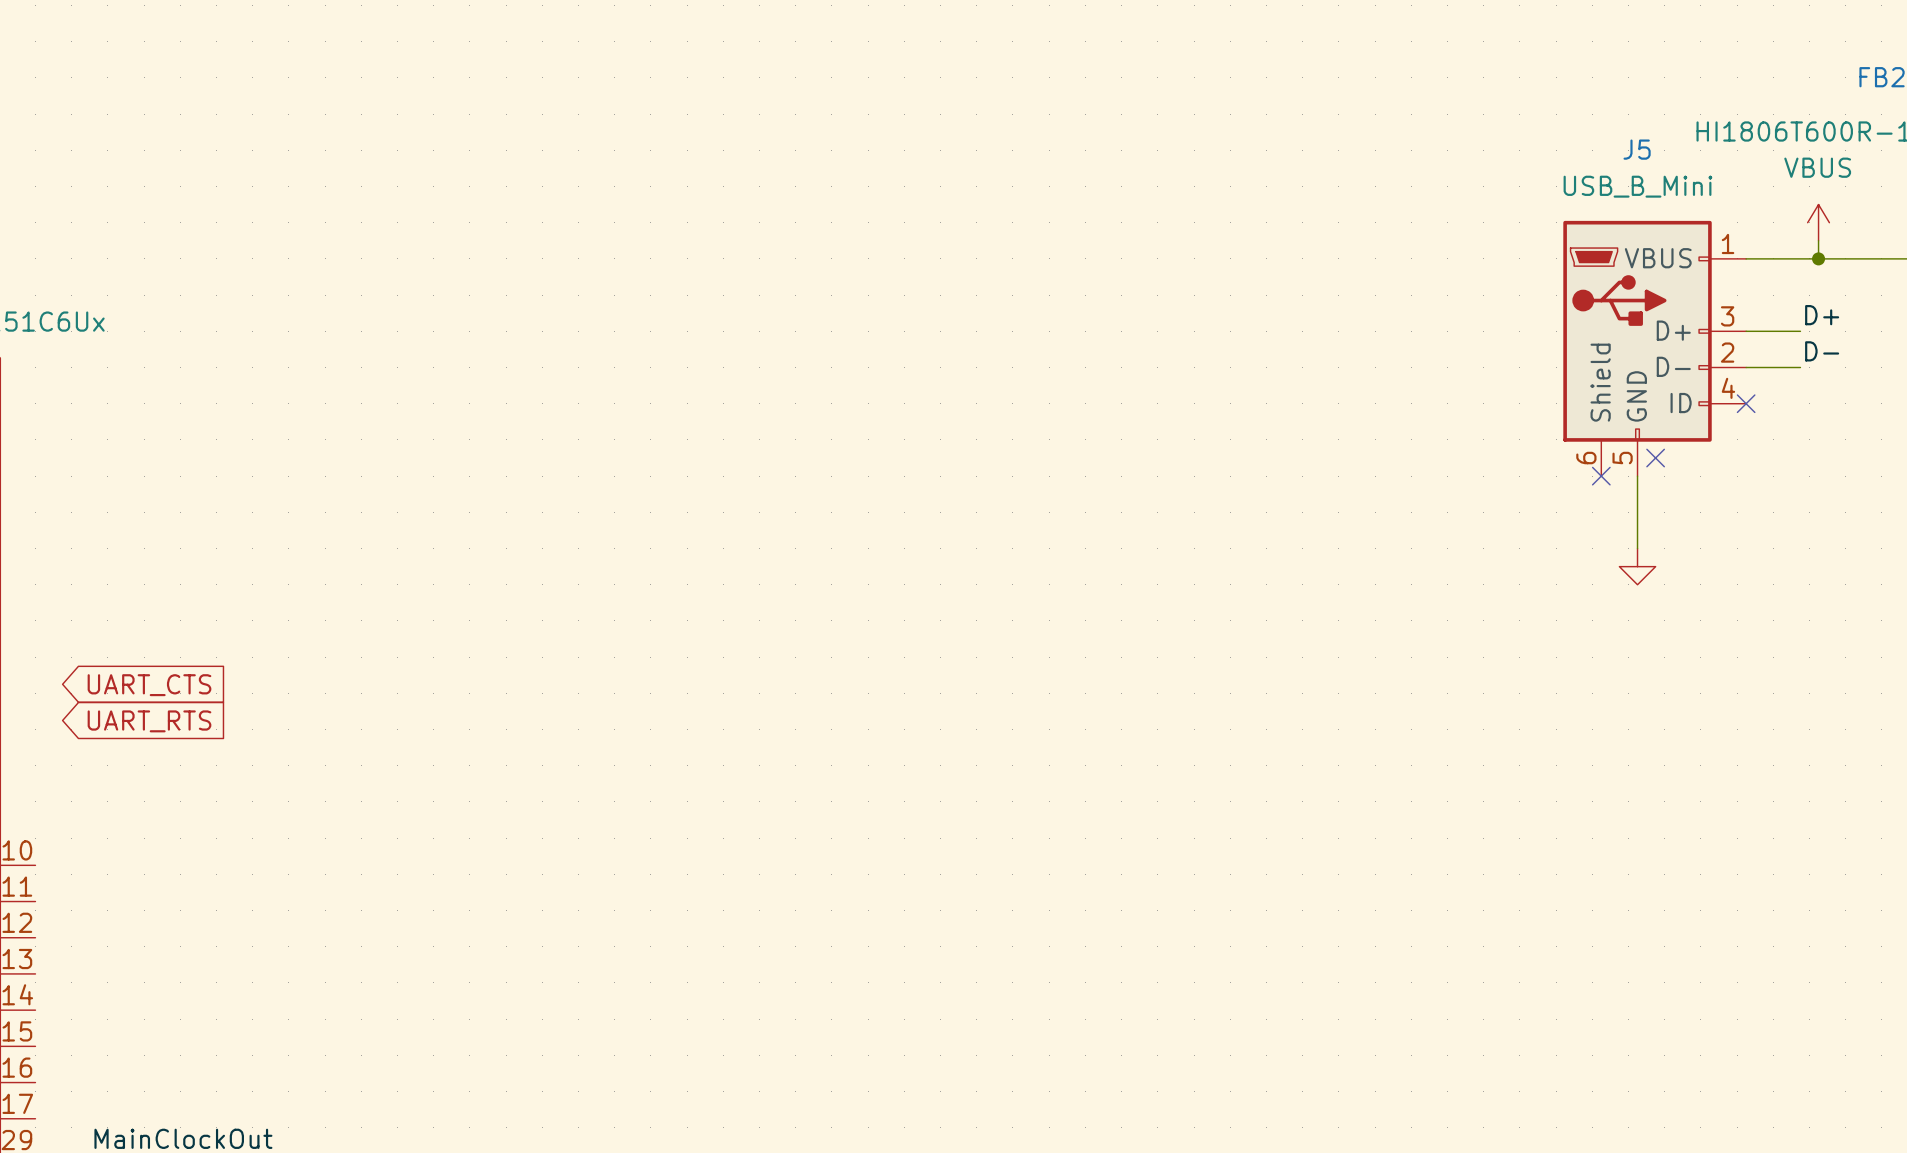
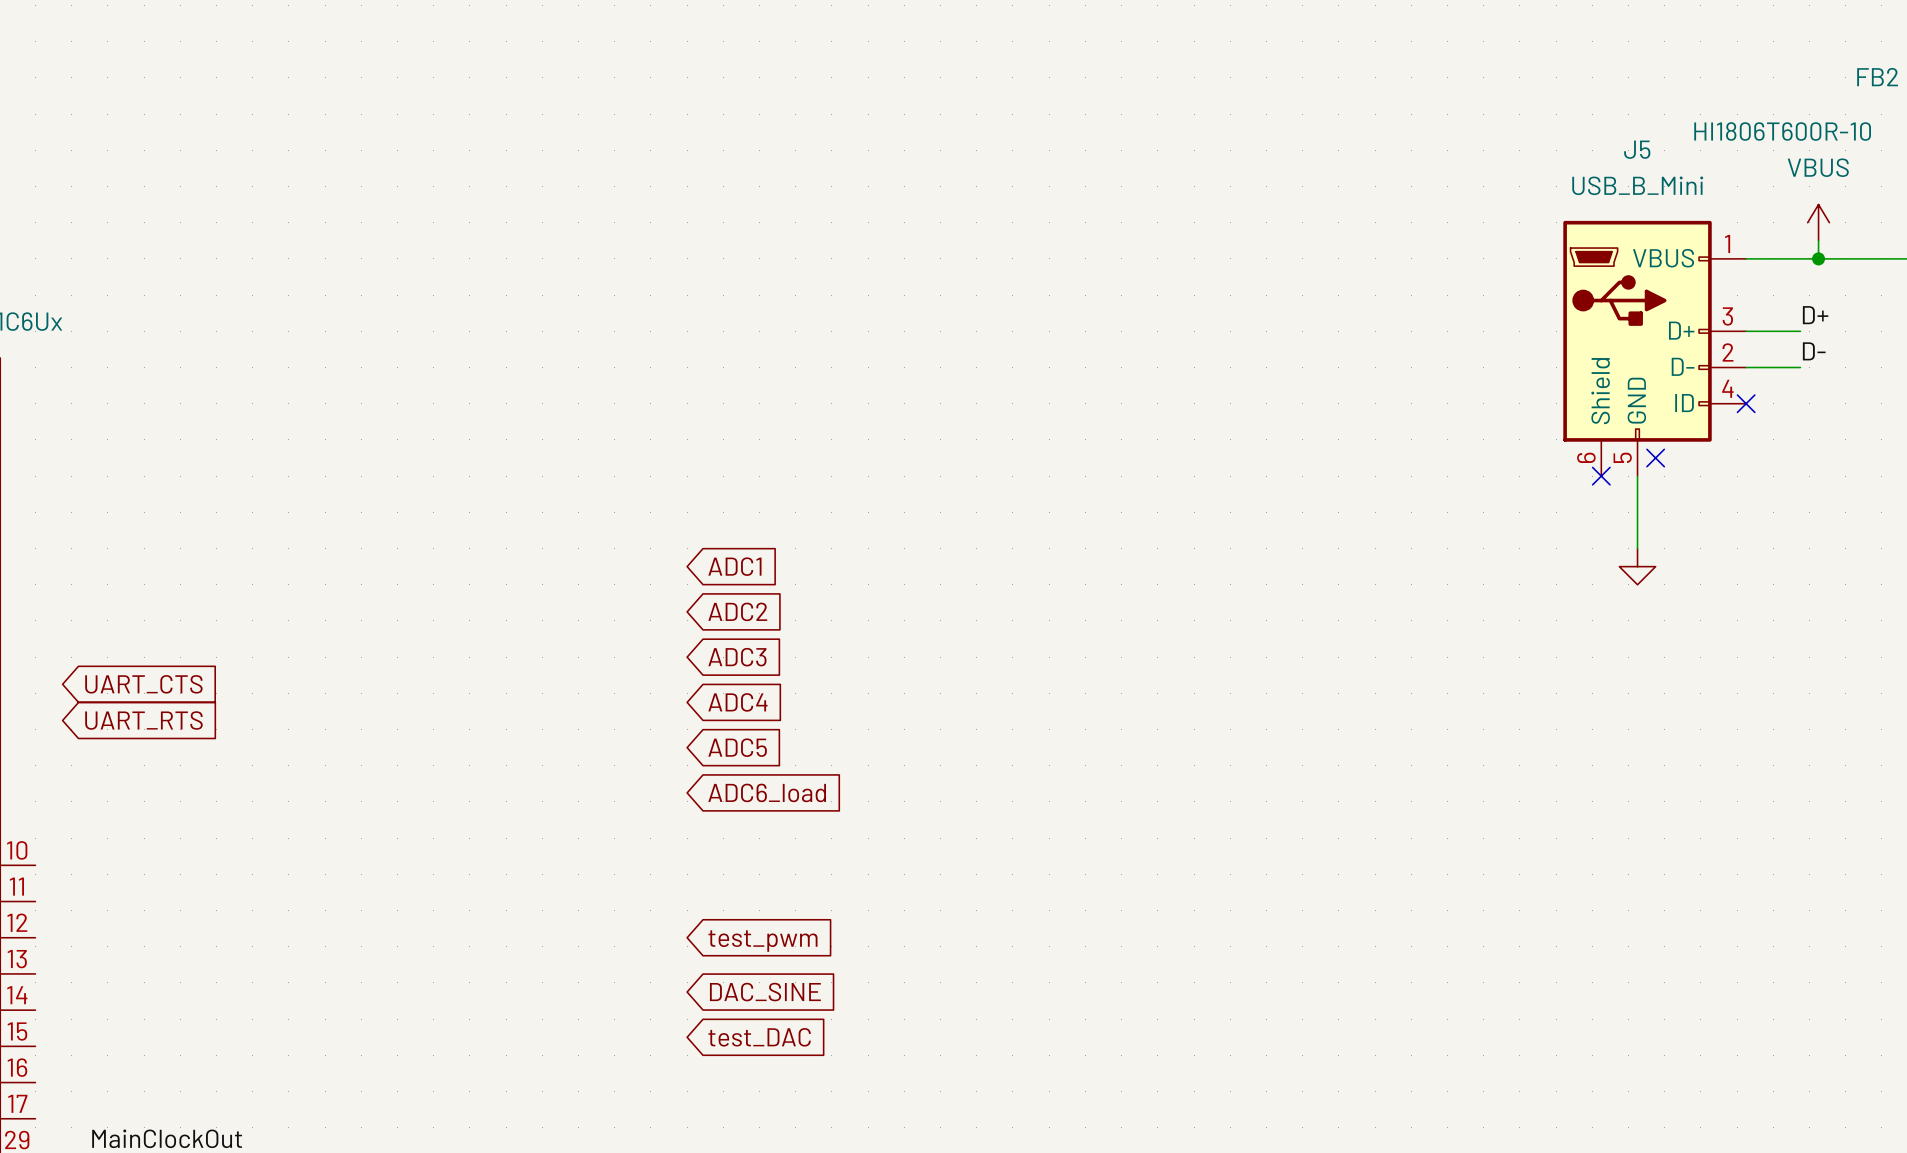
global label: none -> ADC1 (734, 566)
global label: none -> ADC2 (737, 611)
global label: none -> ADC3 (737, 657)
global label: none -> ADC4 (737, 702)
global label: none -> ADC5 (737, 747)
global label: none -> ADC6_load (767, 792)
global label: none -> test_pwm (762, 941)
global label: none -> DAC_SINE (765, 992)
global label: none -> test_DAC (759, 1037)

